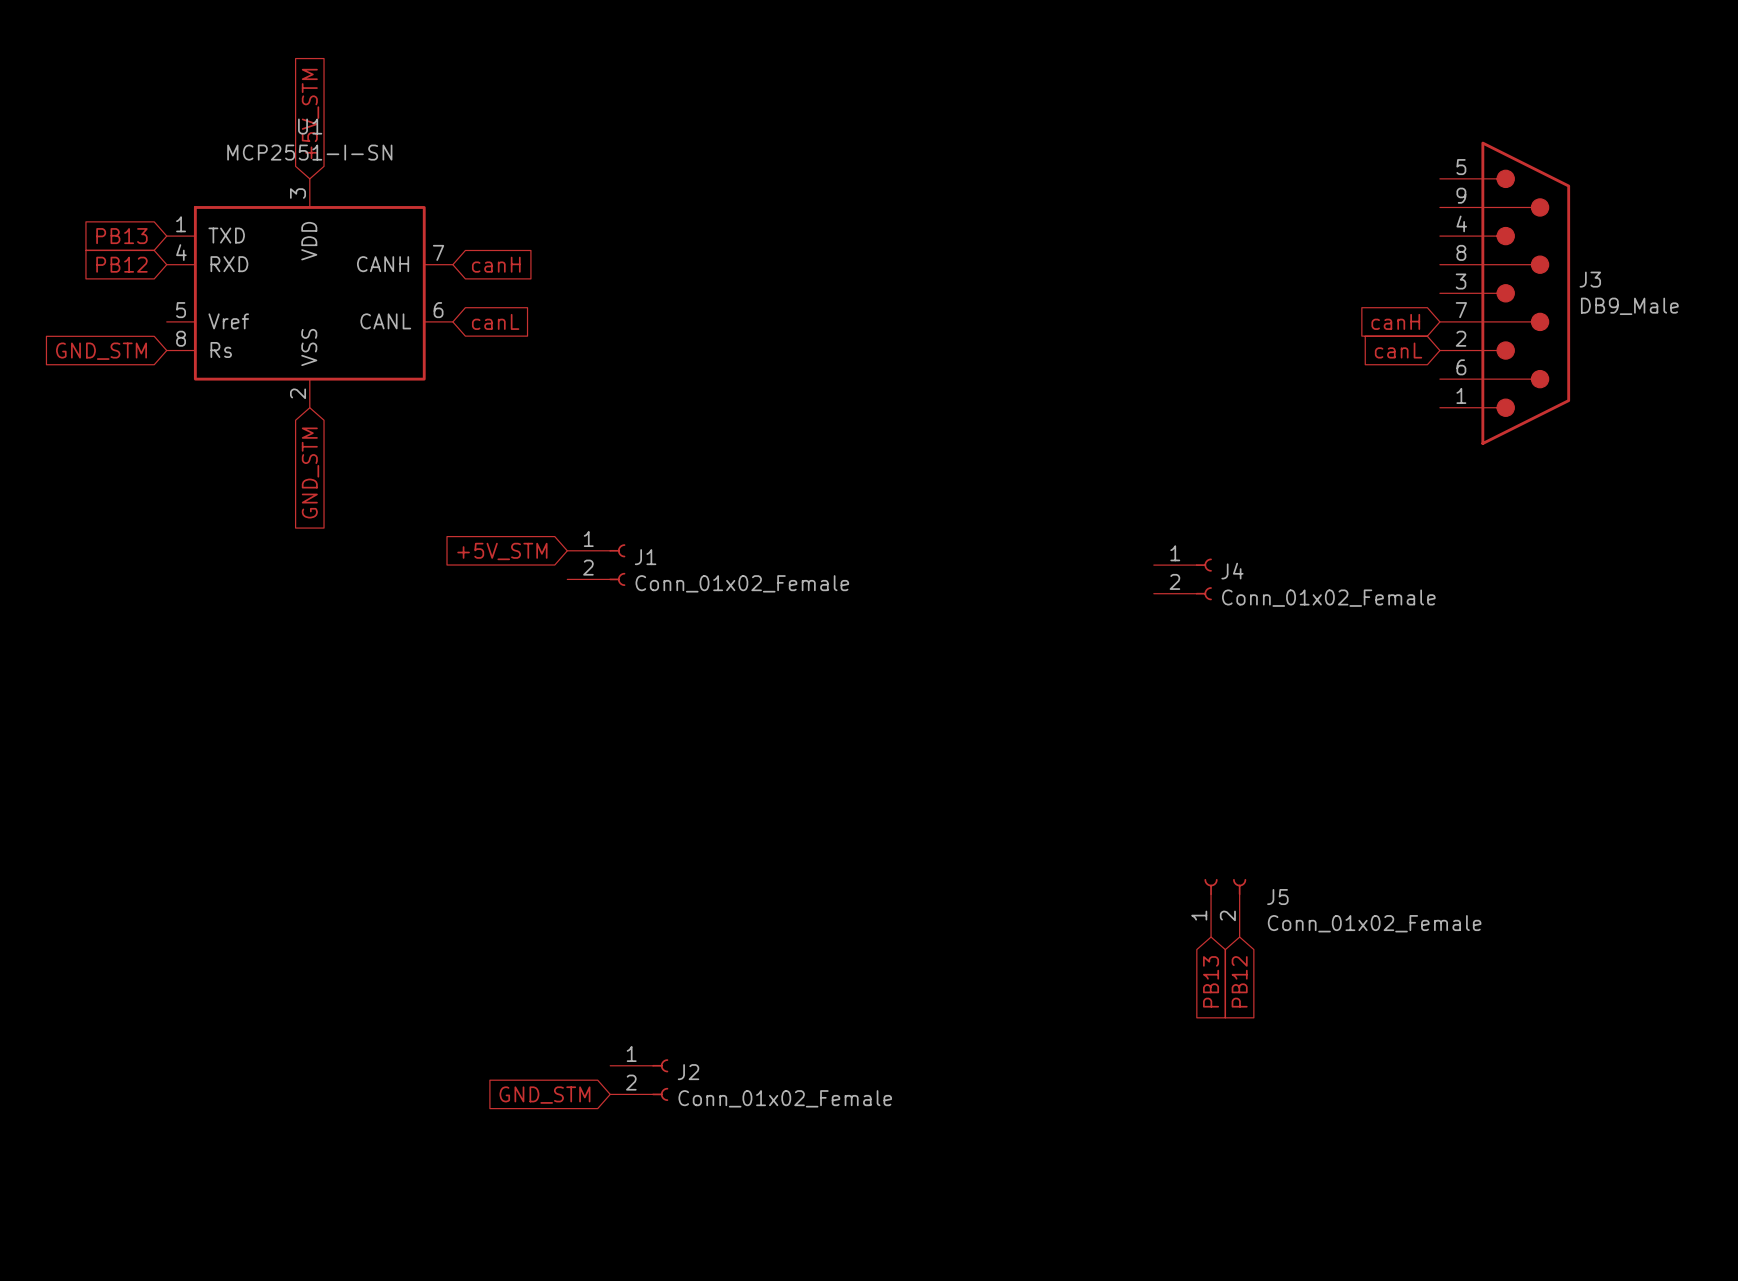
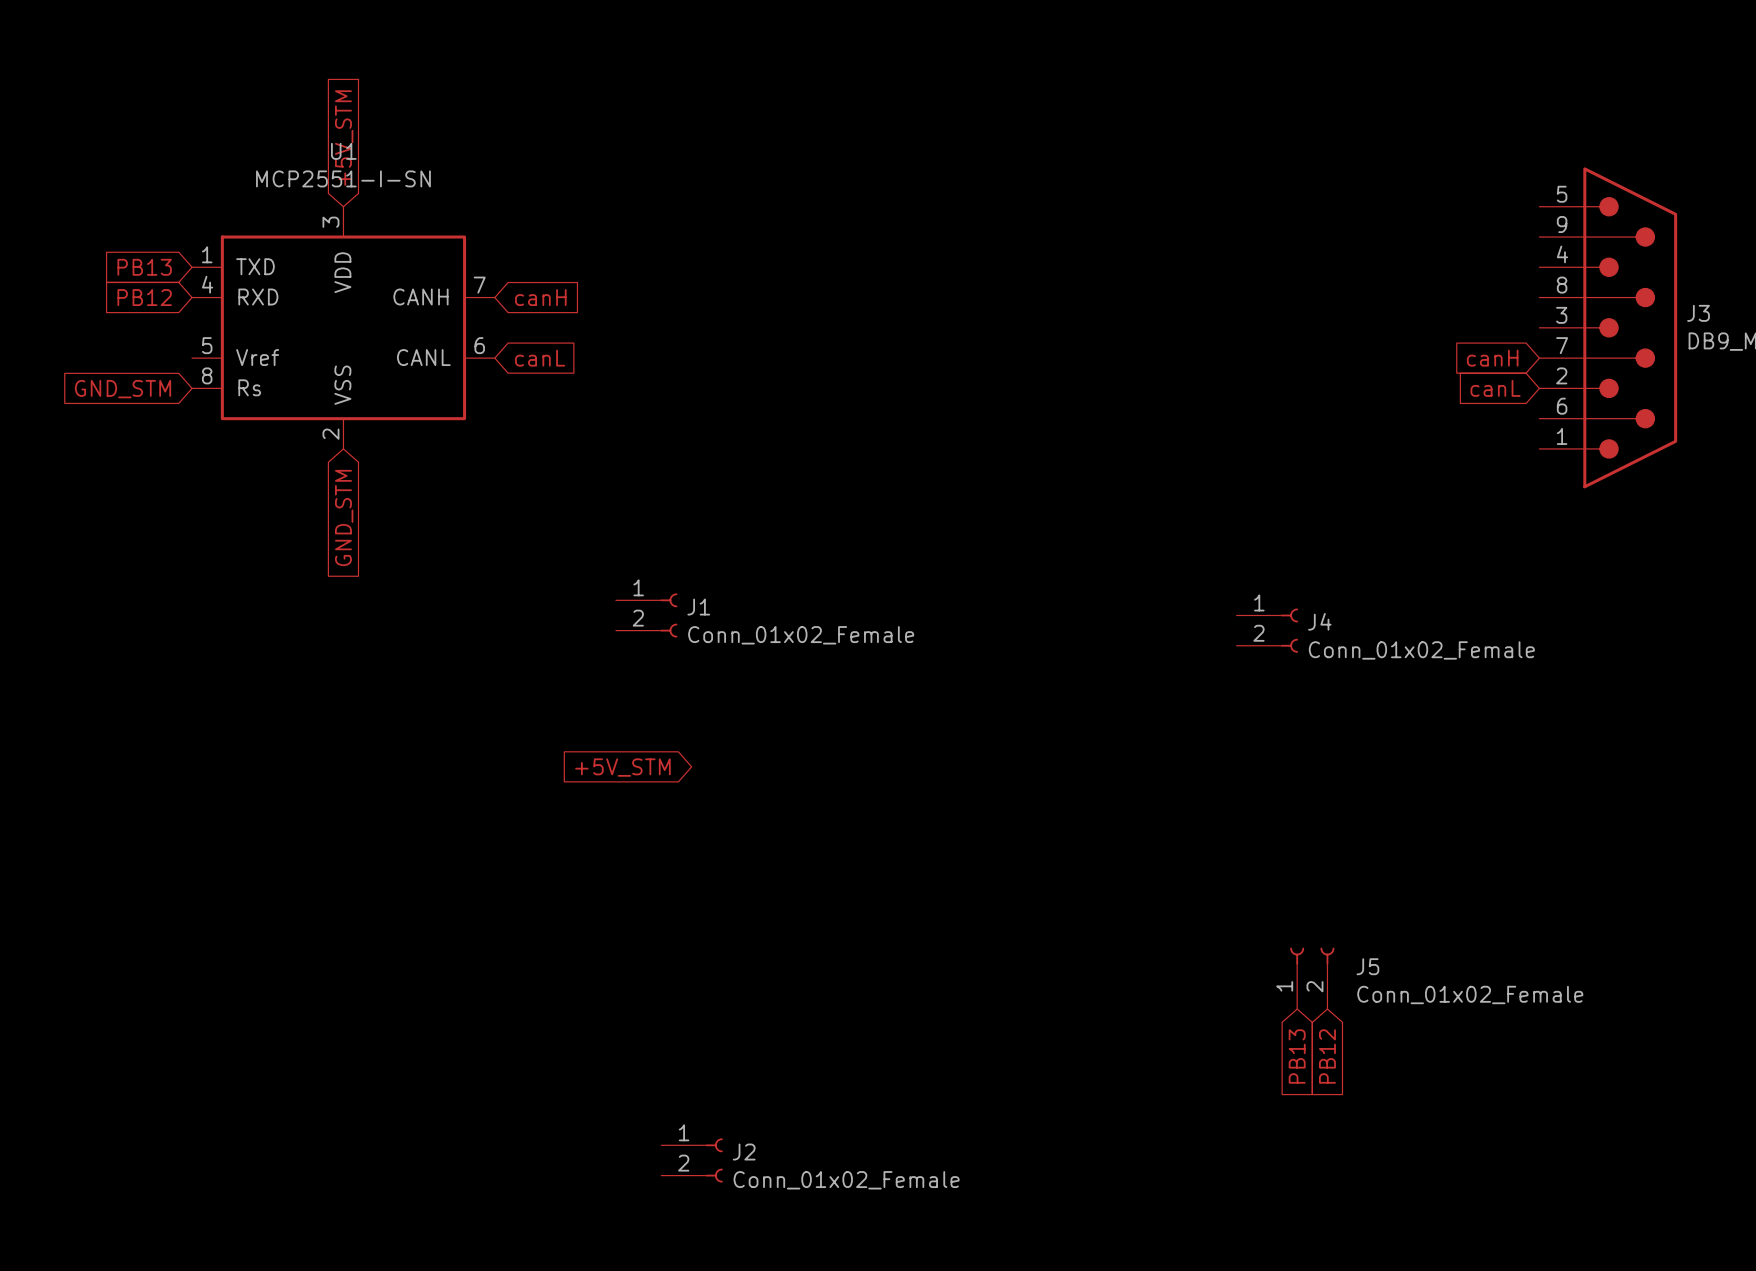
global label position: +5V_STM (502, 551) -> +5V_STM (622, 767)
global label: GND_STM (544, 1095) -> none

